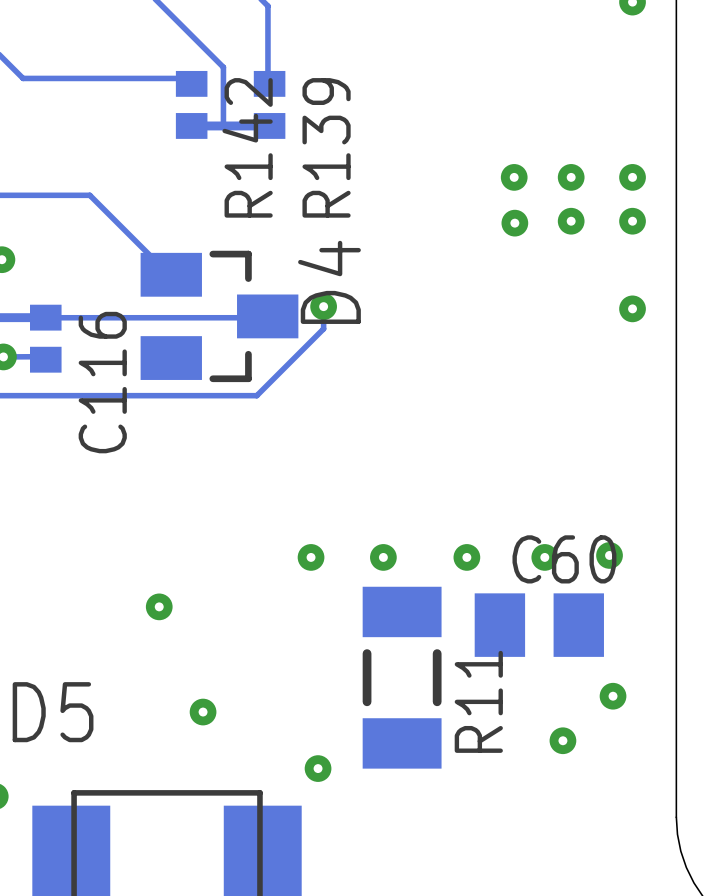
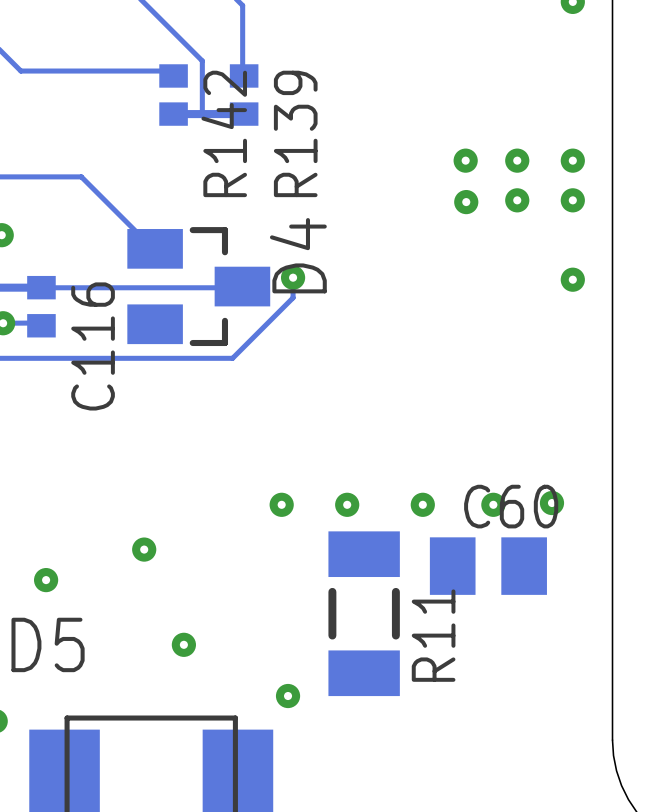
via: none -> (46, 580)
via: (613, 696) -> none
via: (562, 740) -> none

